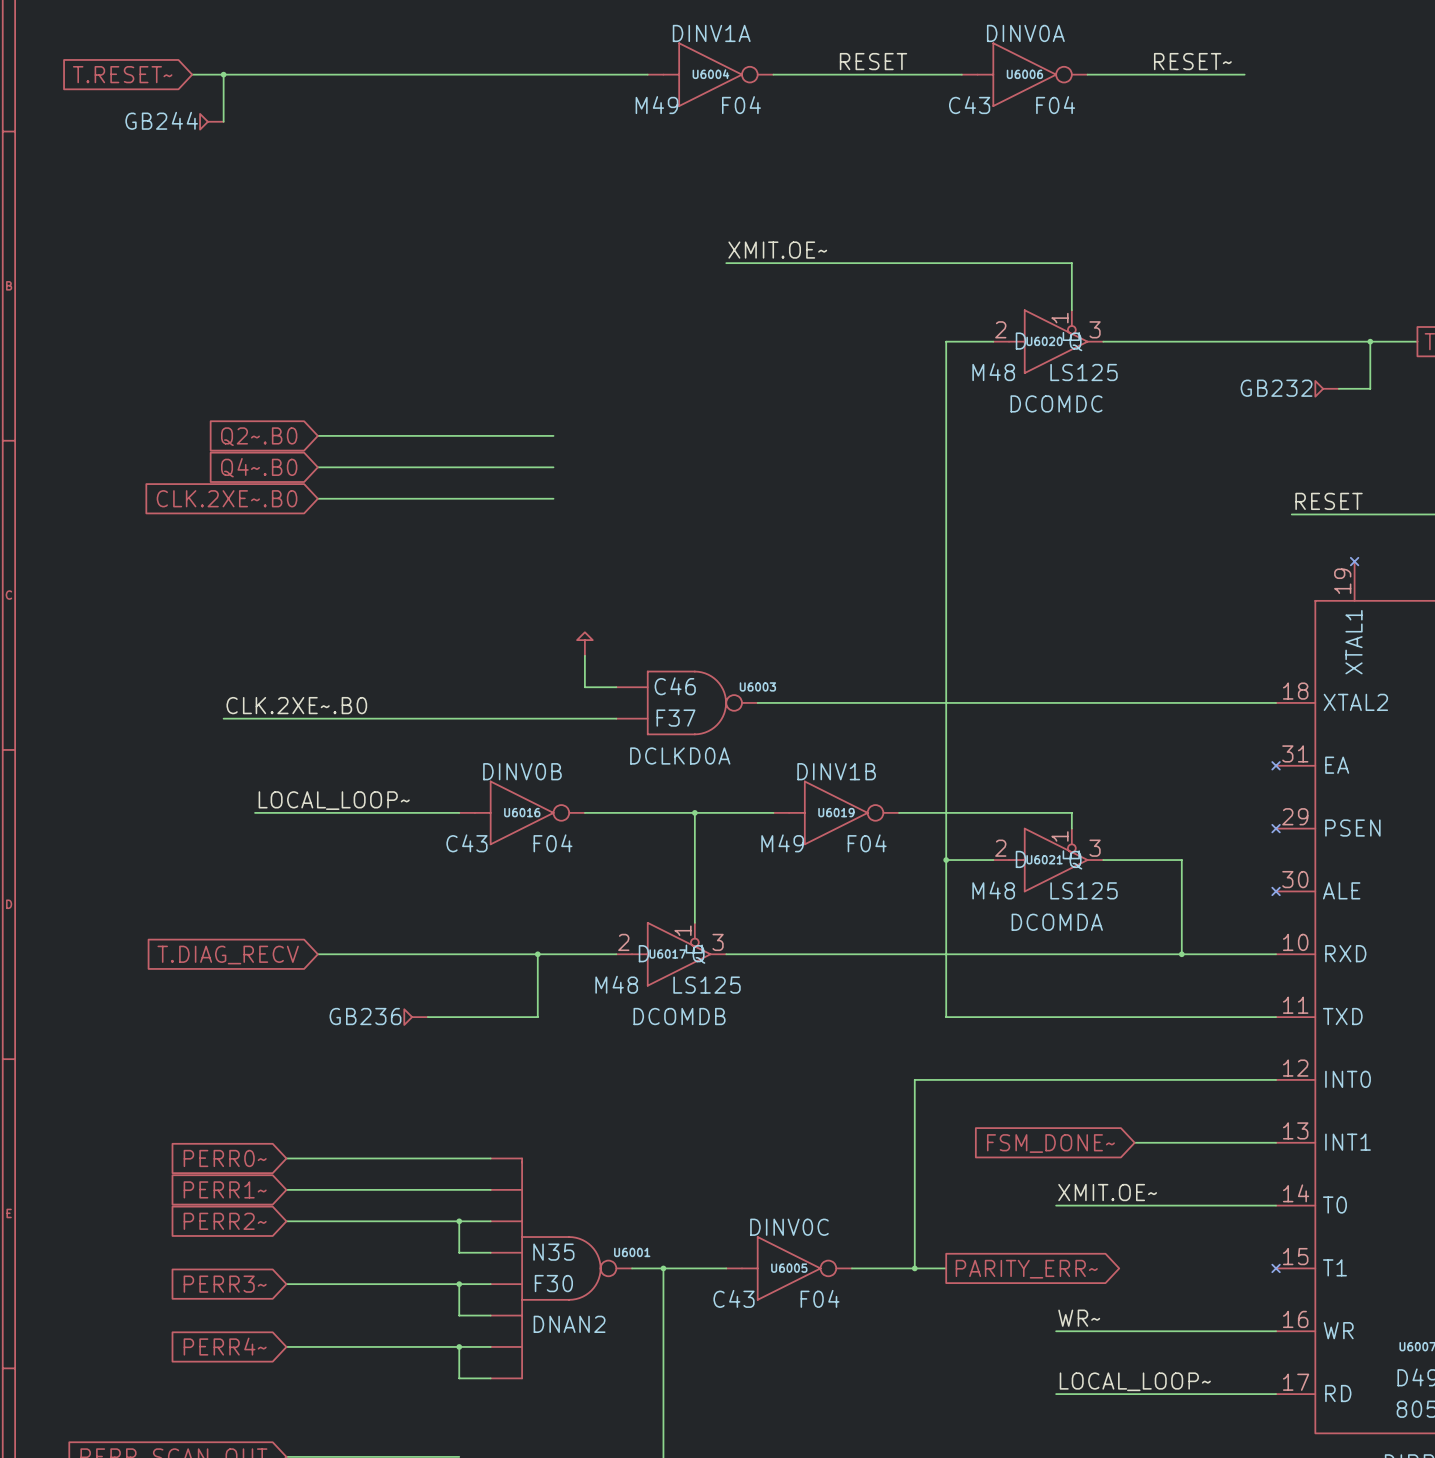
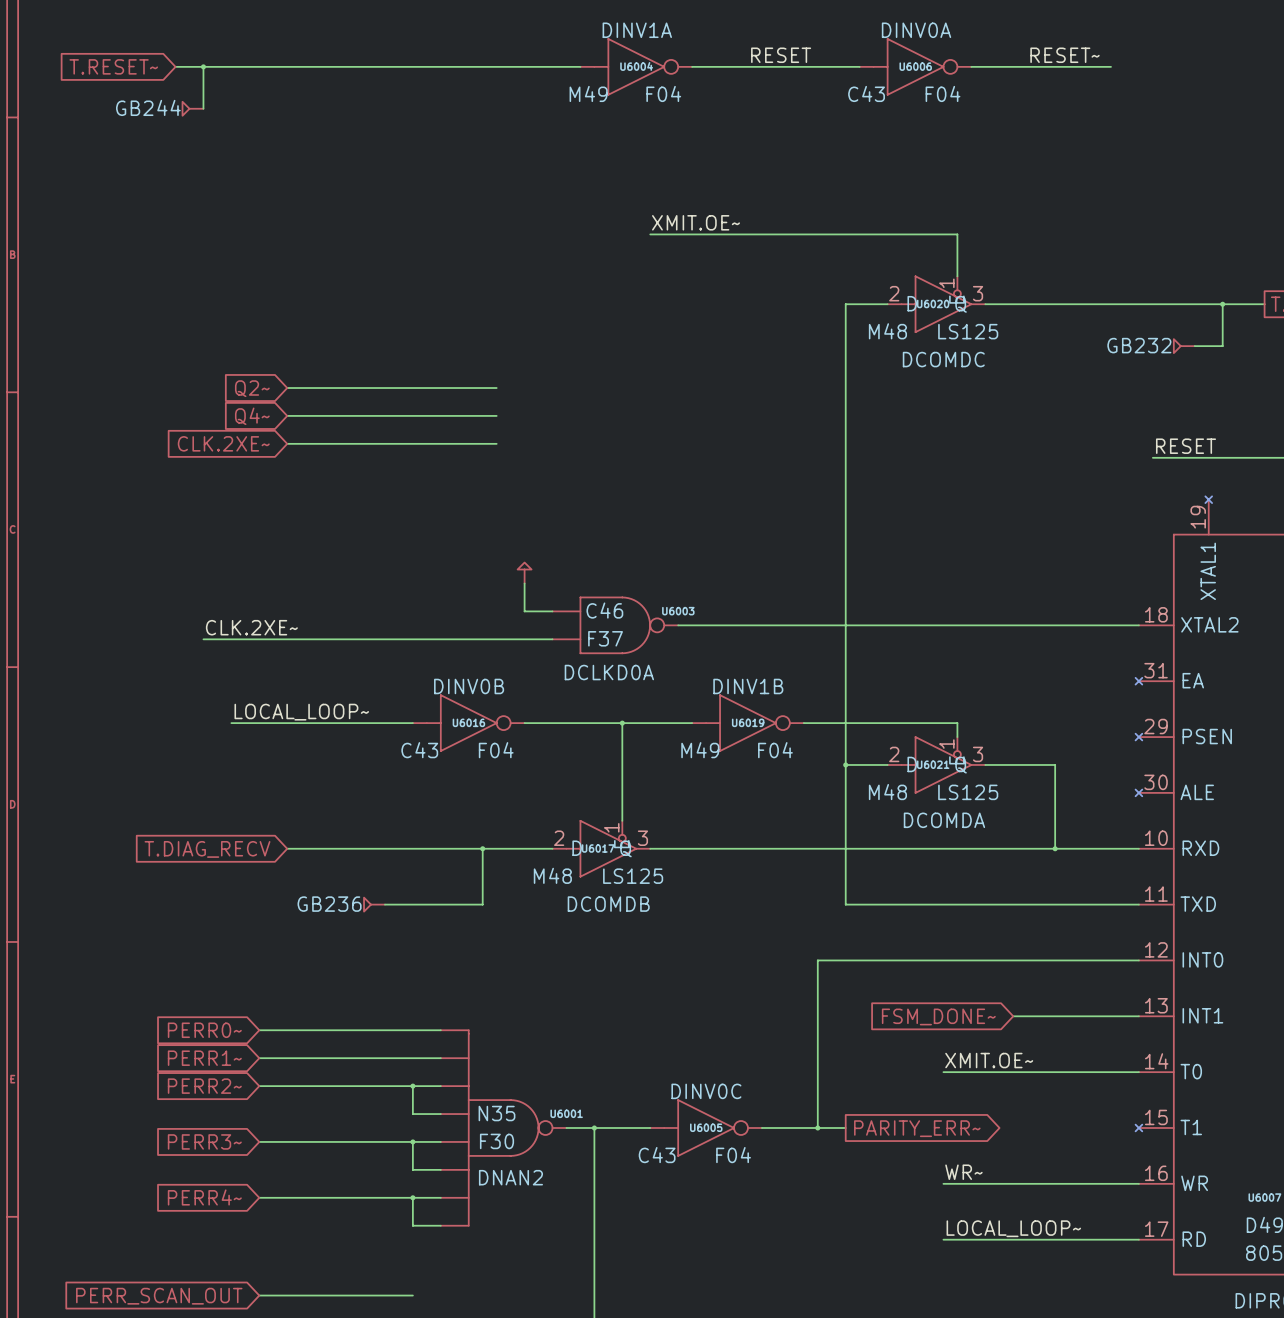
global label: Q2~.B0 (259, 436) -> Q2~ (252, 388)
global label: Q4~.B0 (259, 467) -> Q4~ (252, 416)
global label: CLK.2XE~.B0 (227, 498) -> CLK.2XE~ (223, 443)
label: CLK.2XE~.B0 (296, 705) -> CLK.2XE~ (251, 627)

